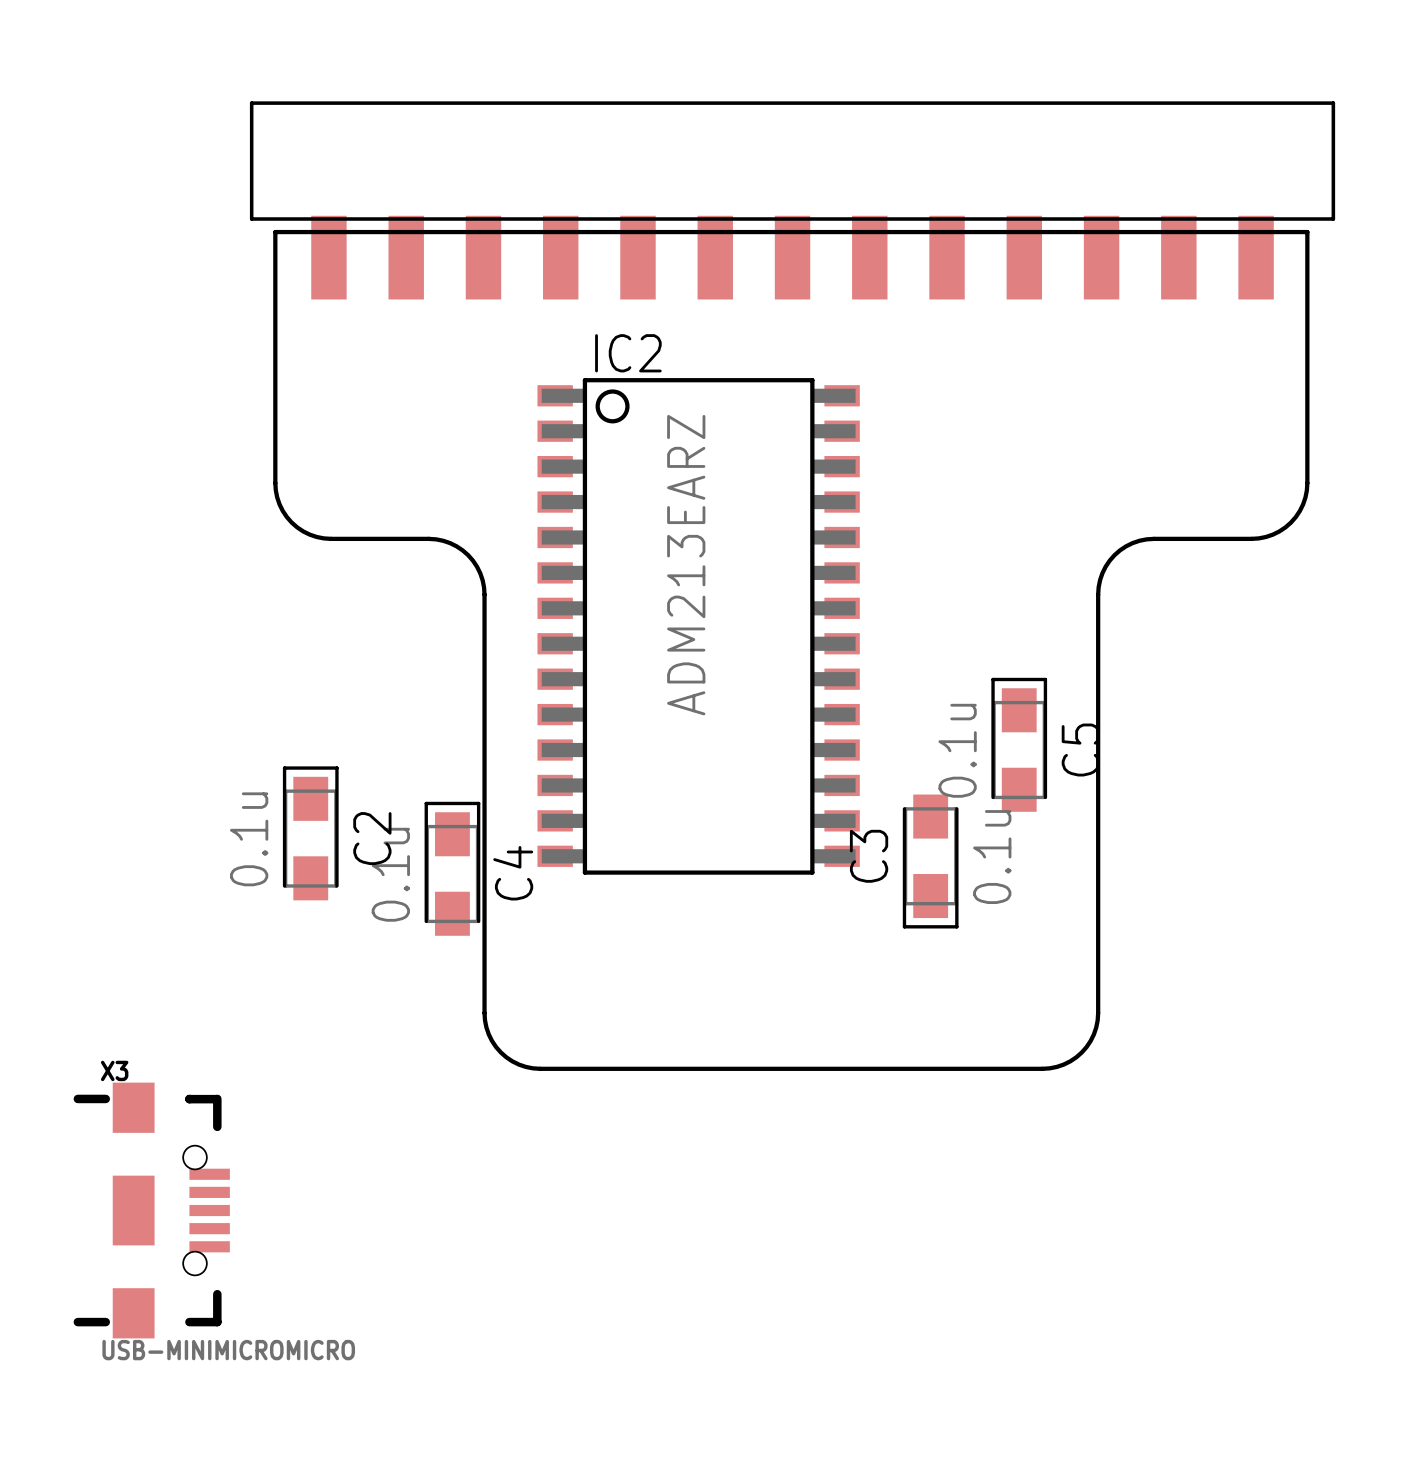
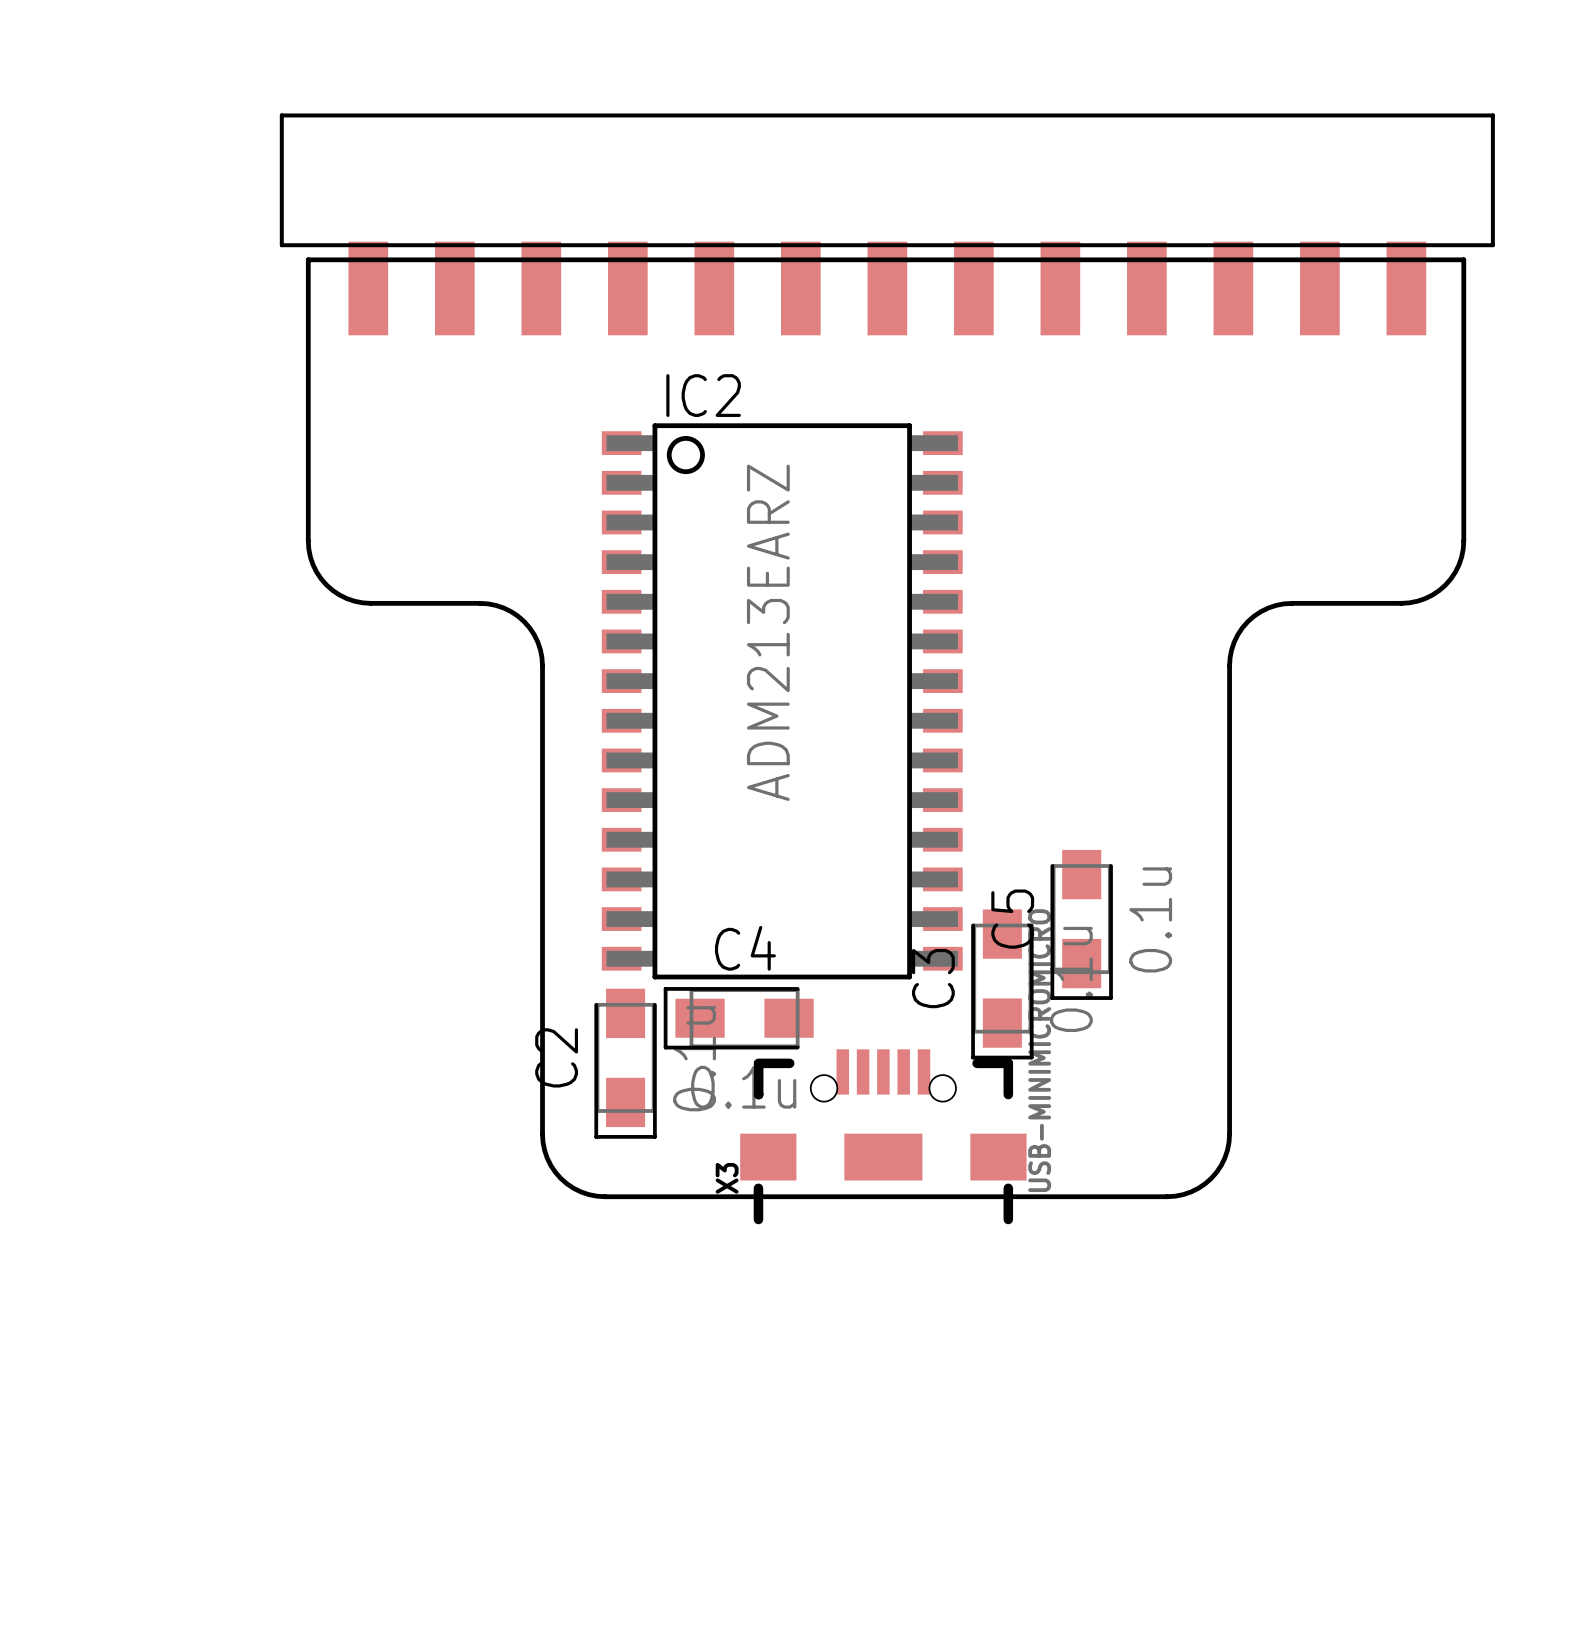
C5 rotation: 0° (1019, 744) -> 180° (1081, 924)
C5 position: (1019, 744) -> (1081, 924)
C2 rotation: 0° (310, 833) -> 180° (625, 1063)
C2 position: (310, 833) -> (625, 1063)
C3 position: (930, 861) -> (1002, 984)
C4 rotation: 0° (452, 868) -> 90° counterclockwise (738, 1018)
C4 position: (452, 868) -> (738, 1018)
X3 rotation: 0° (151, 1210) -> 90° counterclockwise (883, 1136)
X3 position: (151, 1210) -> (883, 1136)

